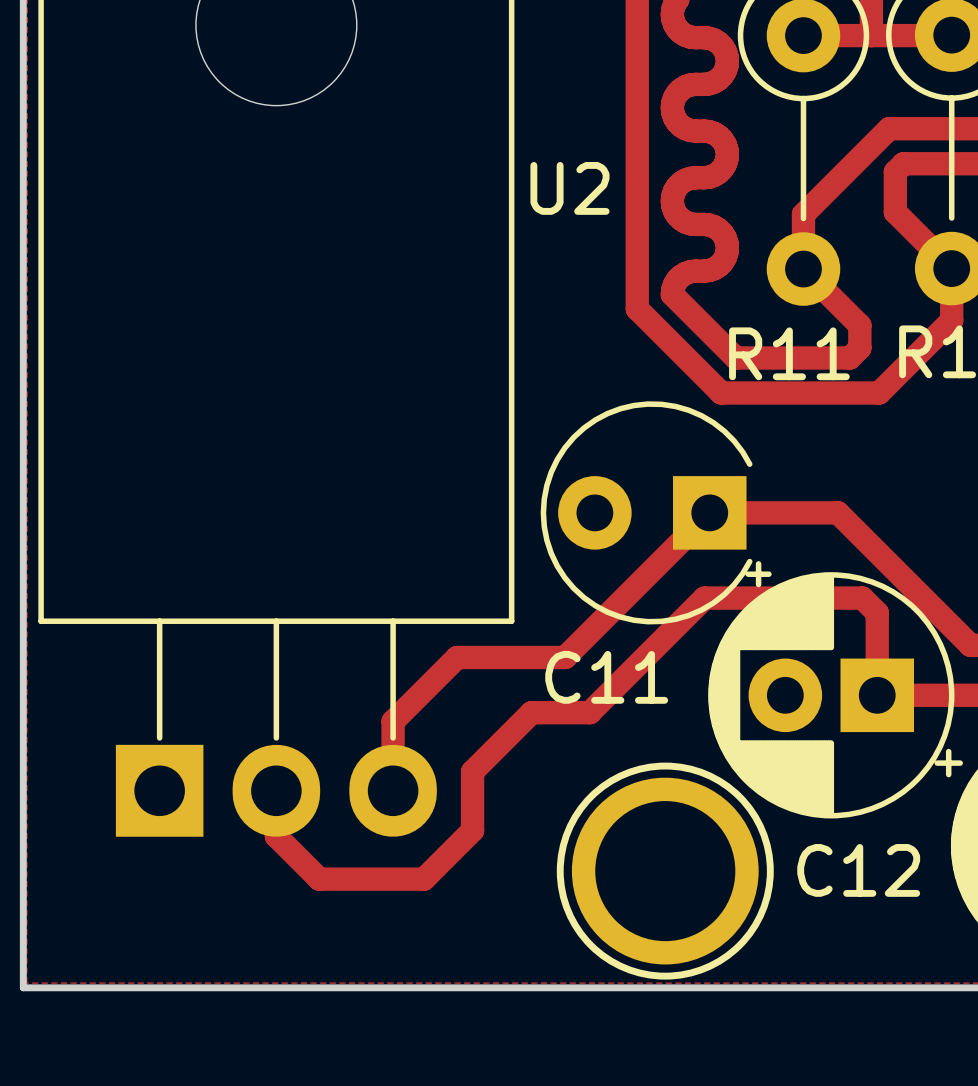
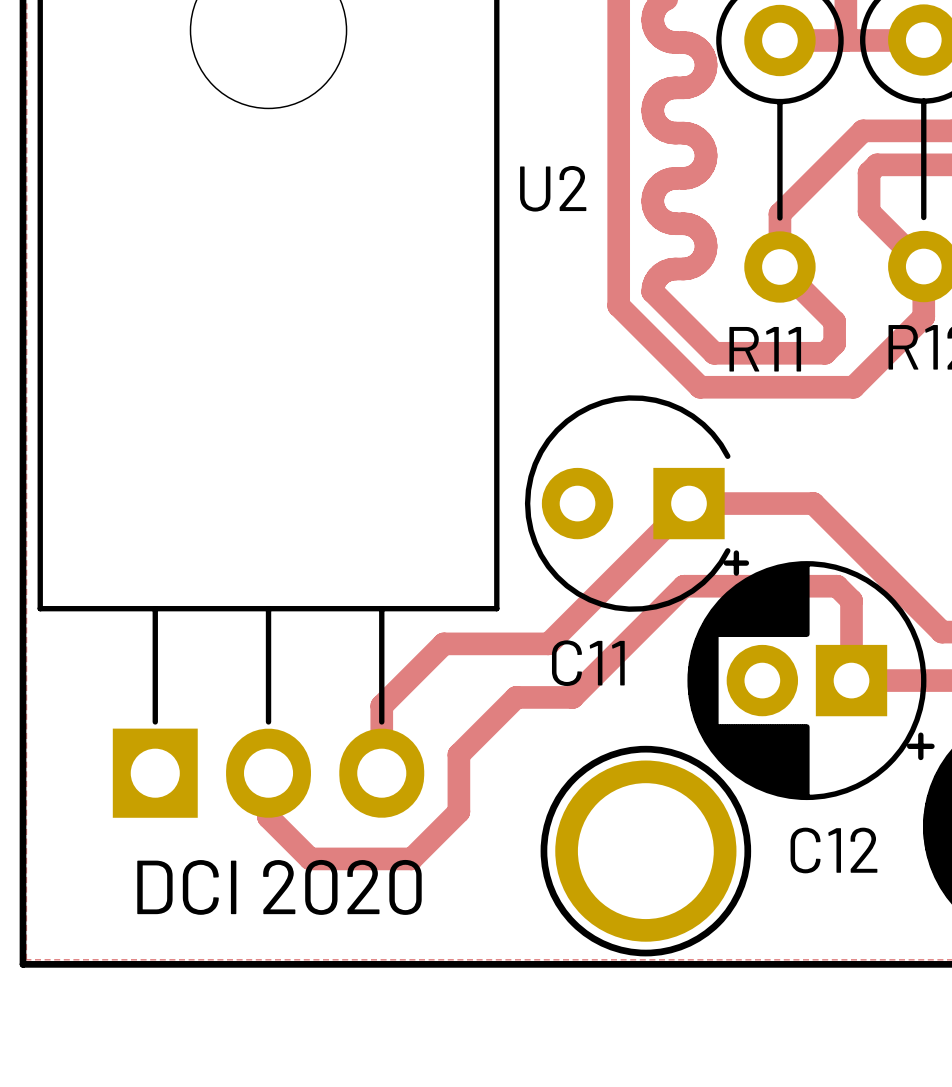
text: none -> DCI 2020 (279, 887)

